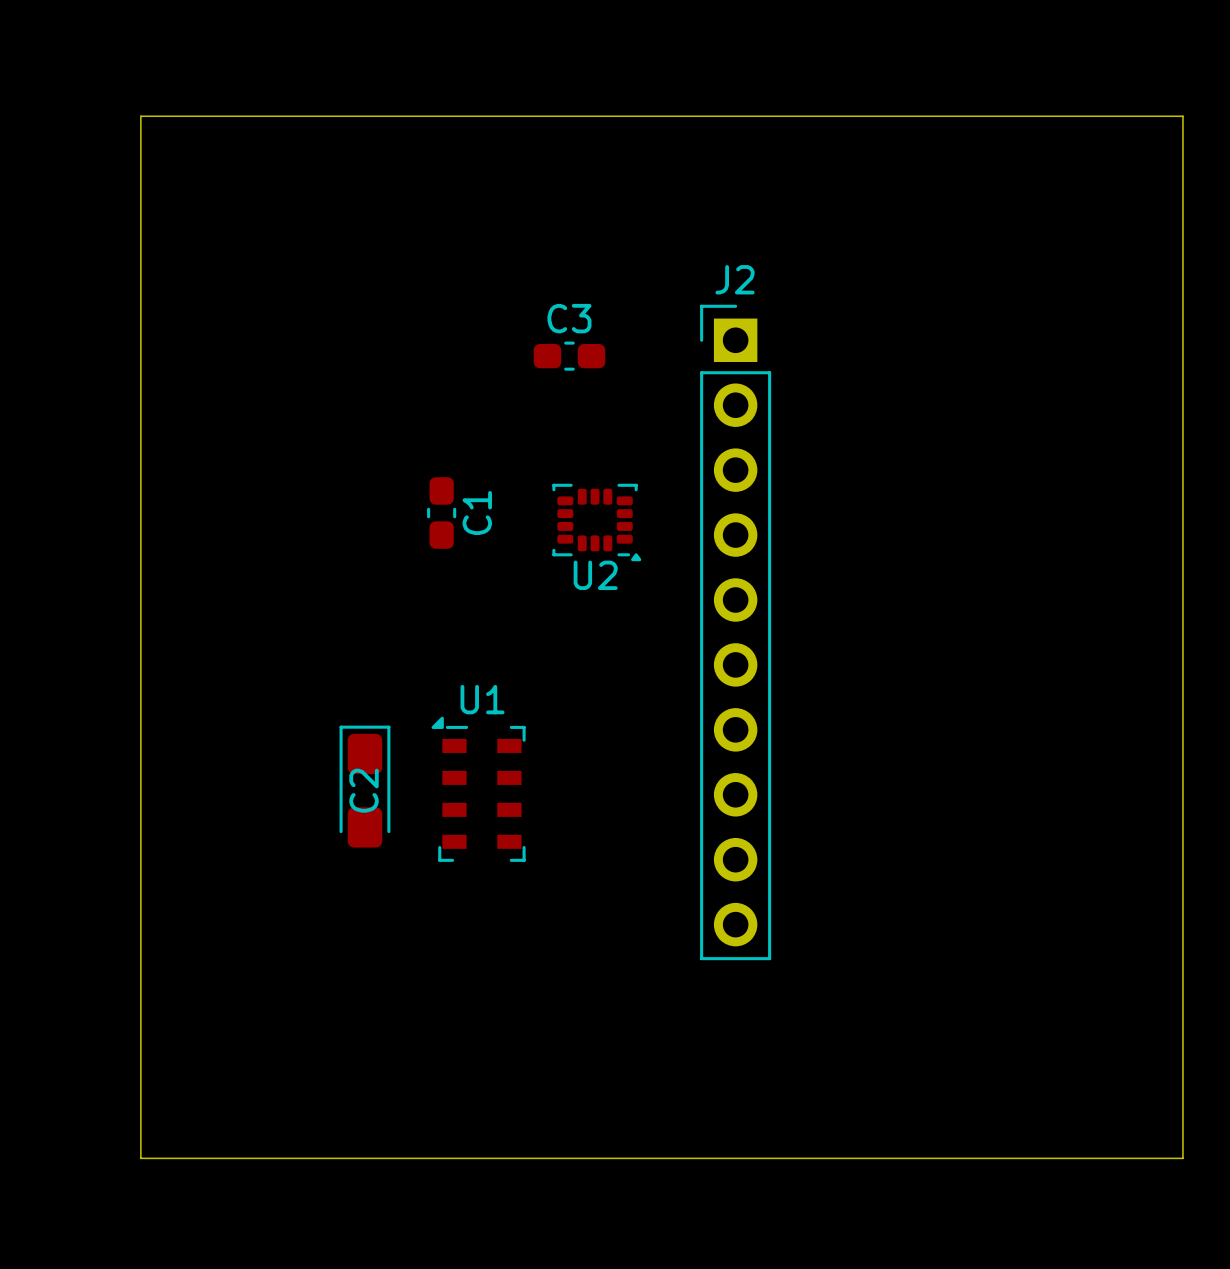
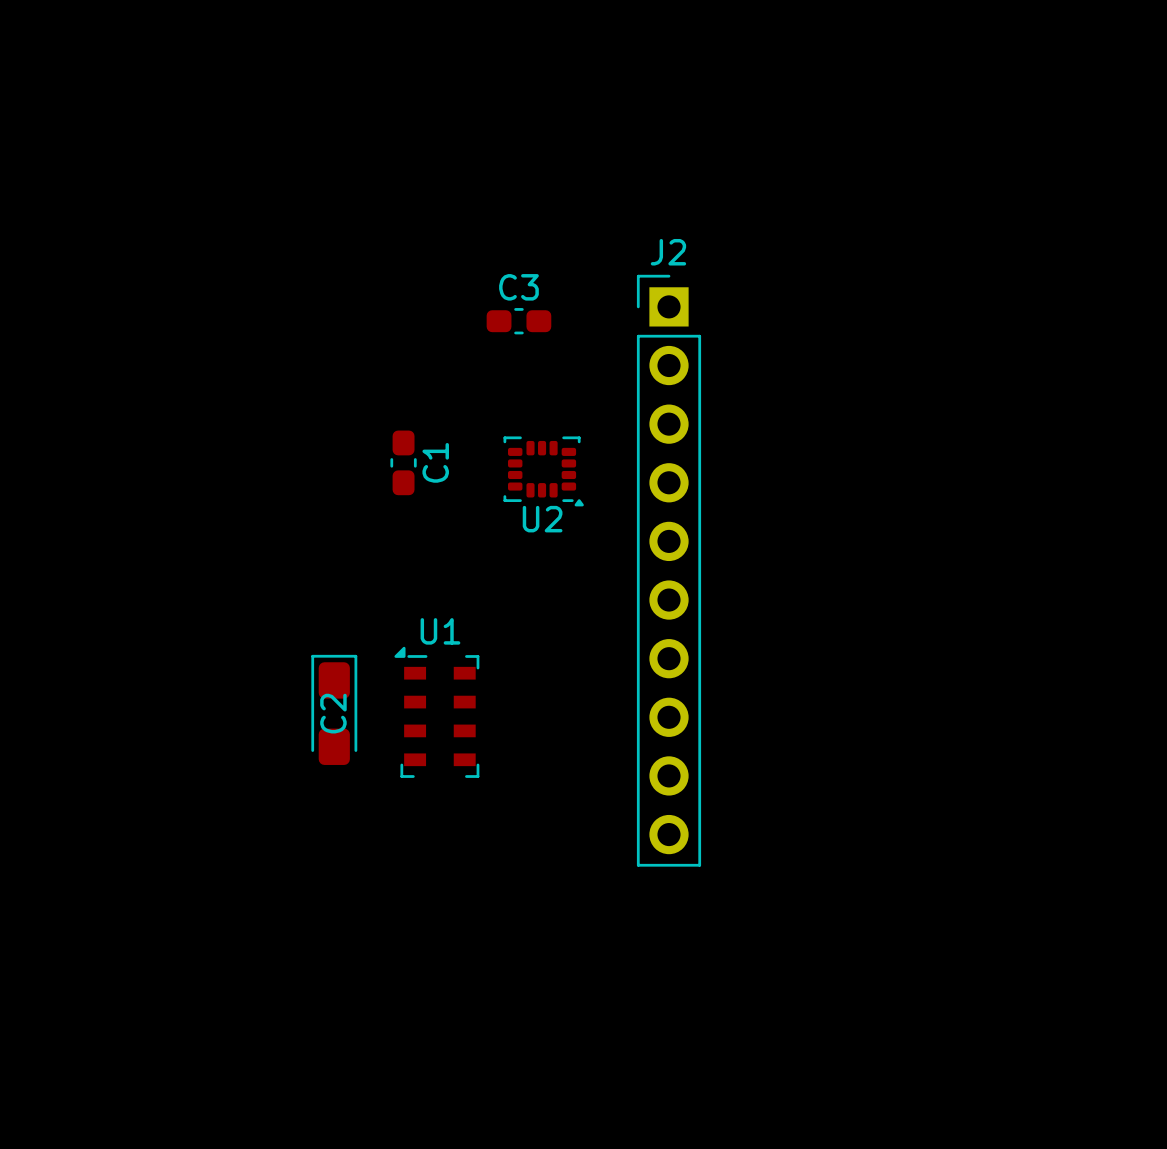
board edge: (140, 116) (1182, 116) (1182, 1158) (140, 1158) (140, 116) -> none

